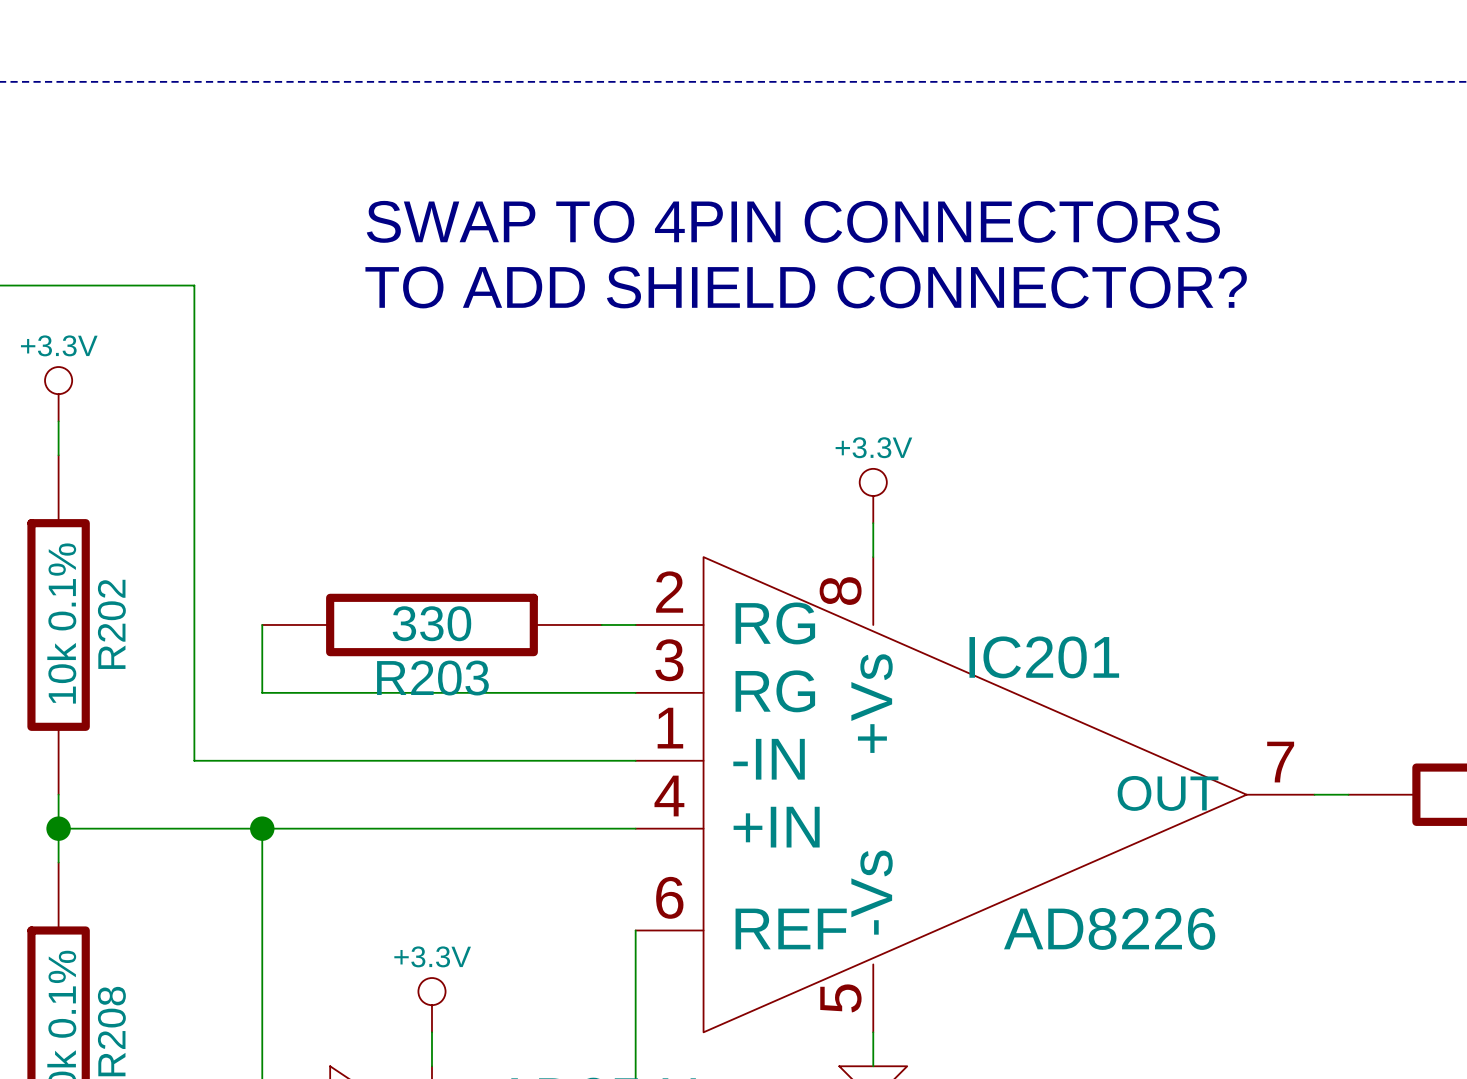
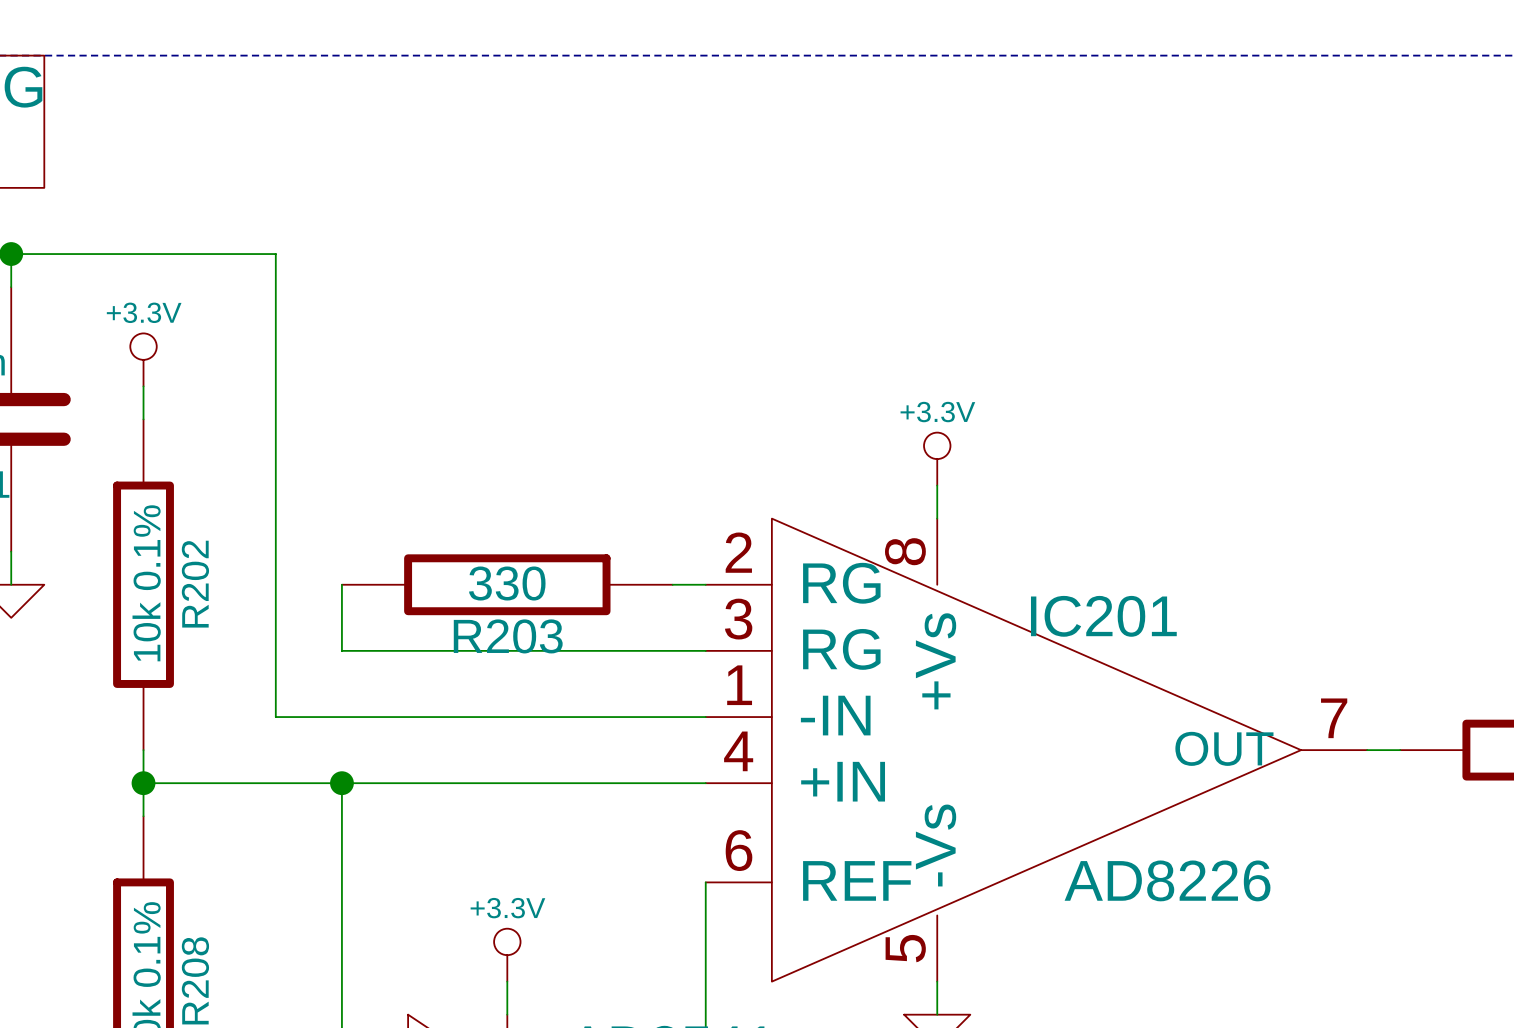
text: SWAP TO 4PIN CONNECTORS (793, 221) -> none
text: TO ADD SHIELD CONNECTOR? (806, 287) -> none

